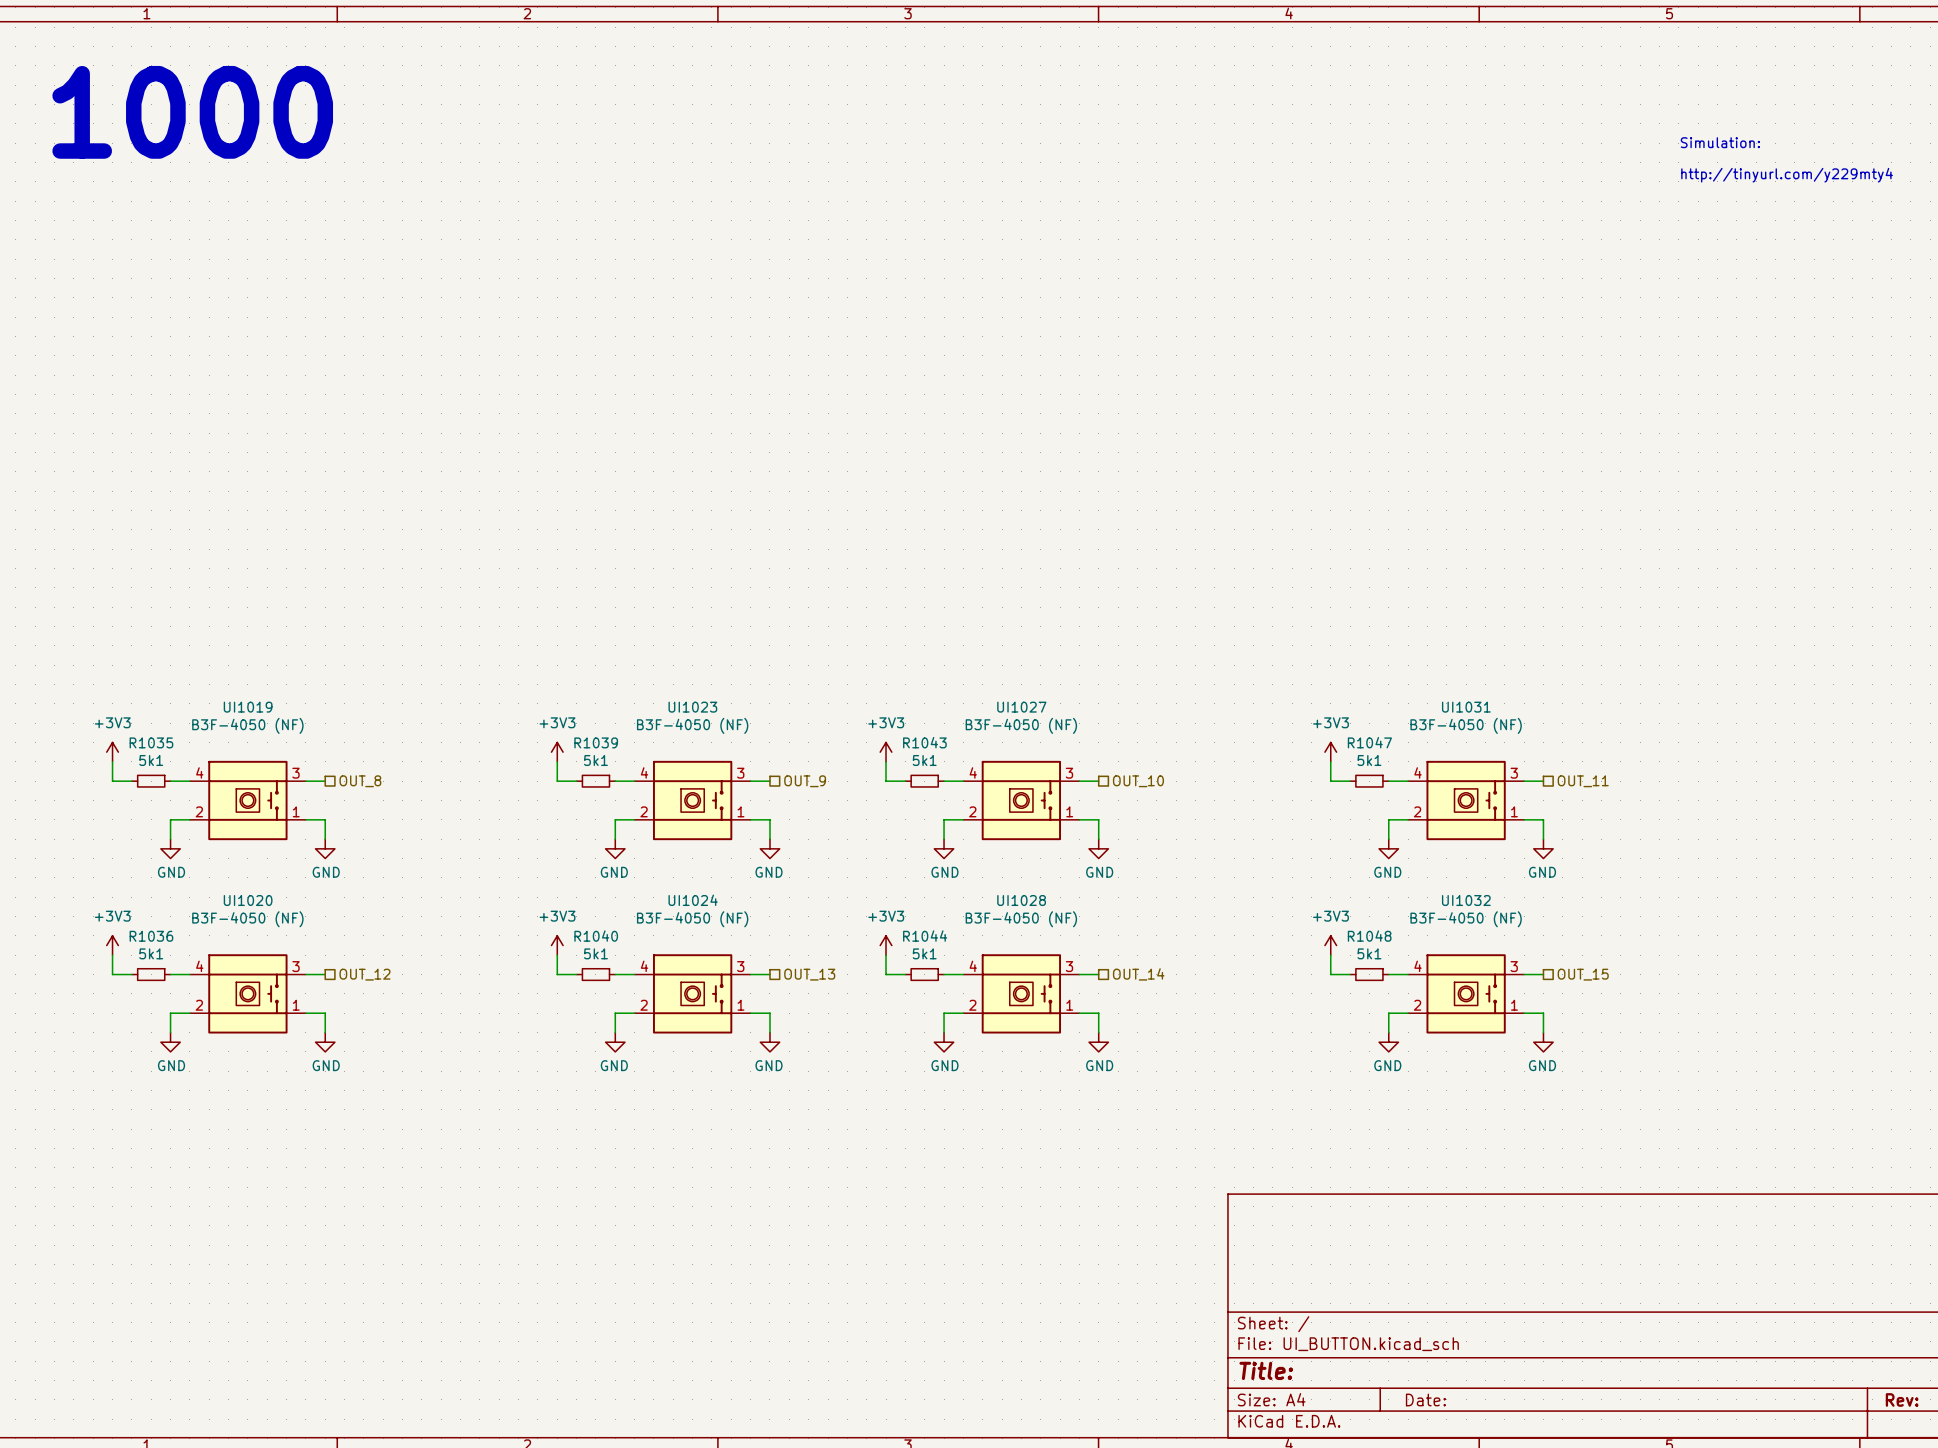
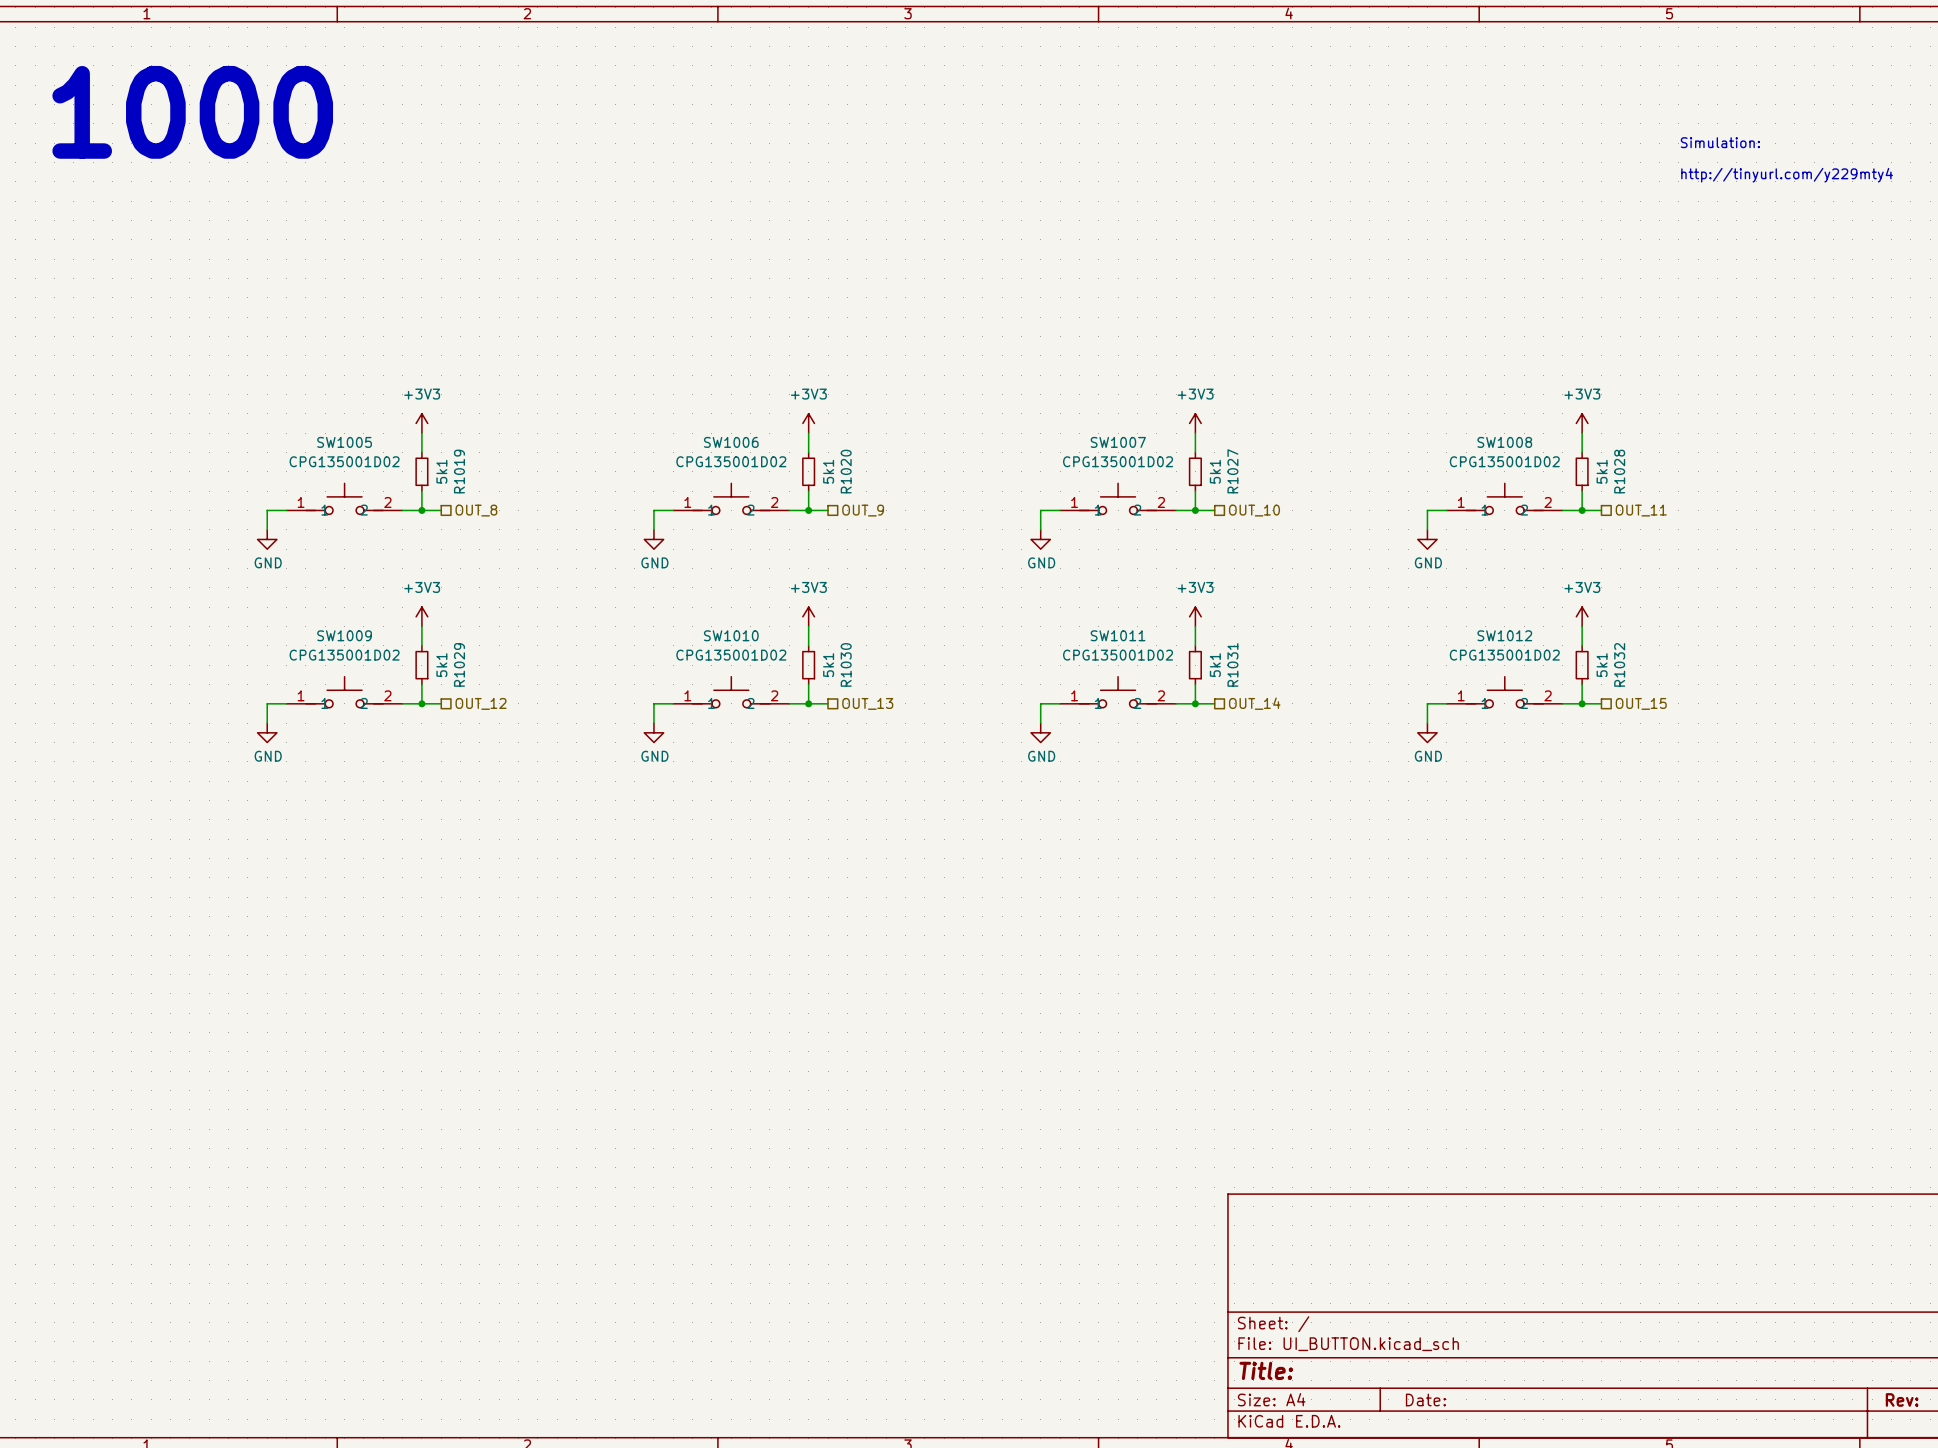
power symbol: none -> +3V3 (421, 423)
power symbol: none -> +3V3 (808, 423)
power symbol: none -> +3V3 (1195, 423)
power symbol: none -> +3V3 (1582, 423)
wire: none -> (421, 433) (421, 452)
wire: none -> (808, 433) (808, 452)
wire: none -> (1195, 433) (1195, 452)
wire: none -> (1582, 433) (1582, 452)
R1019: none -> 5k1 (421, 471)
R1020: none -> 5k1 (808, 471)
R1027: none -> 5k1 (1195, 471)
R1028: none -> 5k1 (1582, 471)
wire: none -> (421, 491) (421, 510)
wire: none -> (808, 491) (808, 510)
wire: none -> (1195, 491) (1195, 510)
wire: none -> (1582, 491) (1582, 510)
SW1005: none -> CPG135001D02 (344, 498)
SW1006: none -> CPG135001D02 (731, 498)
SW1007: none -> CPG135001D02 (1118, 498)
SW1008: none -> CPG135001D02 (1504, 498)
wire: none -> (286, 510) (267, 510) (267, 529)
wire: none -> (402, 510) (441, 510)
junction: none -> (421, 510)
hierarchical label: none -> OUT_8 (476, 510)
wire: none -> (673, 510) (653, 510) (653, 529)
wire: none -> (789, 510) (828, 510)
junction: none -> (808, 510)
hierarchical label: none -> OUT_9 (863, 510)
wire: none -> (1060, 510) (1040, 510) (1040, 529)
wire: none -> (1176, 510) (1214, 510)
junction: none -> (1195, 510)
hierarchical label: none -> OUT_10 (1254, 510)
wire: none -> (1446, 510) (1427, 510) (1427, 529)
wire: none -> (1562, 510) (1601, 510)
junction: none -> (1582, 510)
hierarchical label: none -> OUT_11 (1641, 510)
power symbol: none -> GND (267, 539)
power symbol: none -> GND (653, 539)
power symbol: none -> GND (1040, 539)
power symbol: none -> GND (1427, 539)
power symbol: none -> +3V3 (421, 616)
power symbol: none -> +3V3 (808, 616)
power symbol: none -> +3V3 (1195, 616)
power symbol: none -> +3V3 (1582, 616)
wire: none -> (421, 626) (421, 645)
wire: none -> (808, 626) (808, 645)
wire: none -> (1195, 626) (1195, 645)
wire: none -> (1582, 626) (1582, 645)
R1029: none -> 5k1 (421, 665)
R1030: none -> 5k1 (808, 665)
R1031: none -> 5k1 (1195, 665)
R1032: none -> 5k1 (1582, 665)
wire: none -> (421, 684) (421, 703)
wire: none -> (808, 684) (808, 703)
wire: none -> (1195, 684) (1195, 703)
wire: none -> (1582, 684) (1582, 703)
SW1009: none -> CPG135001D02 (344, 692)
SW1010: none -> CPG135001D02 (731, 692)
SW1011: none -> CPG135001D02 (1118, 692)
SW1012: none -> CPG135001D02 (1504, 692)
wire: none -> (402, 703) (441, 703)
junction: none -> (421, 703)
hierarchical label: none -> OUT_12 (481, 703)
wire: none -> (789, 703) (828, 703)
junction: none -> (808, 703)
hierarchical label: none -> OUT_13 (867, 703)
wire: none -> (1176, 703) (1214, 703)
junction: none -> (1195, 703)
hierarchical label: none -> OUT_14 (1254, 703)
wire: none -> (1562, 703) (1601, 703)
junction: none -> (1582, 703)
hierarchical label: none -> OUT_15 (1641, 703)
power symbol: none -> GND (267, 732)
power symbol: none -> GND (653, 732)
power symbol: none -> GND (1040, 732)
power symbol: none -> GND (1427, 732)
power symbol: +3V3 (112, 752) -> none
power symbol: +3V3 (557, 752) -> none
power symbol: +3V3 (886, 752) -> none
power symbol: +3V3 (1330, 752) -> none
wire: (112, 761) (112, 781) (131, 781) -> none
wire: (557, 761) (557, 781) (576, 781) -> none
wire: (886, 761) (886, 781) (905, 781) -> none
wire: (1330, 761) (1330, 781) (1350, 781) -> none
R1035: 5k1 (151, 781) -> none
wire: (170, 781) (189, 781) -> none
wire: (305, 781) (325, 781) -> none
hierarchical label: OUT_8 (360, 781) -> none
R1039: 5k1 (595, 781) -> none
wire: (615, 781) (634, 781) -> none
wire: (750, 781) (769, 781) -> none
hierarchical label: OUT_9 (805, 781) -> none
R1043: 5k1 (924, 781) -> none
wire: (944, 781) (963, 781) -> none
wire: (1079, 781) (1098, 781) -> none
hierarchical label: OUT_10 (1138, 781) -> none
R1047: 5k1 (1369, 781) -> none
wire: (1388, 781) (1408, 781) -> none
wire: (1524, 781) (1543, 781) -> none
hierarchical label: OUT_11 (1583, 781) -> none
UI1019: B3F-4050 (NF) (247, 800) -> none
UI1023: B3F-4050 (NF) (692, 800) -> none
UI1027: B3F-4050 (NF) (1021, 800) -> none
UI1031: B3F-4050 (NF) (1466, 800) -> none
wire: (189, 819) (170, 819) (170, 839) -> (286, 703) (267, 703) (267, 723)
wire: (305, 819) (325, 819) (325, 839) -> none
wire: (634, 819) (615, 819) (615, 839) -> (673, 703) (653, 703) (653, 723)
wire: (750, 819) (769, 819) (769, 839) -> none
wire: (963, 819) (944, 819) (944, 839) -> (1060, 703) (1040, 703) (1040, 723)
wire: (1079, 819) (1098, 819) (1098, 839) -> none
wire: (1408, 819) (1388, 819) (1388, 839) -> (1446, 703) (1427, 703) (1427, 723)
wire: (1524, 819) (1543, 819) (1543, 839) -> none
power symbol: GND (170, 848) -> none
power symbol: GND (325, 848) -> none
power symbol: GND (615, 848) -> none
power symbol: GND (769, 848) -> none
power symbol: GND (944, 848) -> none
power symbol: GND (1098, 848) -> none
power symbol: GND (1388, 848) -> none
power symbol: GND (1543, 848) -> none
power symbol: +3V3 (112, 945) -> none
power symbol: +3V3 (557, 945) -> none
power symbol: +3V3 (886, 945) -> none
power symbol: +3V3 (1330, 945) -> none
wire: (112, 955) (112, 974) (131, 974) -> none
wire: (557, 955) (557, 974) (576, 974) -> none
wire: (886, 955) (886, 974) (905, 974) -> none
wire: (1330, 955) (1330, 974) (1350, 974) -> none
R1036: 5k1 (151, 974) -> none
wire: (170, 974) (189, 974) -> none
wire: (305, 974) (325, 974) -> none
hierarchical label: OUT_12 (364, 974) -> none
R1040: 5k1 (595, 974) -> none
wire: (615, 974) (634, 974) -> none
wire: (750, 974) (769, 974) -> none
hierarchical label: OUT_13 (809, 974) -> none
R1044: 5k1 (924, 974) -> none
wire: (944, 974) (963, 974) -> none
wire: (1079, 974) (1098, 974) -> none
hierarchical label: OUT_14 (1138, 974) -> none
R1048: 5k1 (1369, 974) -> none
wire: (1388, 974) (1408, 974) -> none
wire: (1524, 974) (1543, 974) -> none
hierarchical label: OUT_15 (1583, 974) -> none
UI1020: B3F-4050 (NF) (247, 993) -> none
UI1024: B3F-4050 (NF) (692, 993) -> none
UI1028: B3F-4050 (NF) (1021, 993) -> none
UI1032: B3F-4050 (NF) (1466, 993) -> none
wire: (189, 1013) (170, 1013) (170, 1032) -> none
wire: (305, 1013) (325, 1013) (325, 1032) -> none
wire: (634, 1013) (615, 1013) (615, 1032) -> none
wire: (750, 1013) (769, 1013) (769, 1032) -> none
wire: (963, 1013) (944, 1013) (944, 1032) -> none
wire: (1079, 1013) (1098, 1013) (1098, 1032) -> none
wire: (1408, 1013) (1388, 1013) (1388, 1032) -> none
wire: (1524, 1013) (1543, 1013) (1543, 1032) -> none
power symbol: GND (170, 1042) -> none
power symbol: GND (325, 1042) -> none
power symbol: GND (615, 1042) -> none
power symbol: GND (769, 1042) -> none
power symbol: GND (944, 1042) -> none
power symbol: GND (1098, 1042) -> none
power symbol: GND (1388, 1042) -> none
power symbol: GND (1543, 1042) -> none

